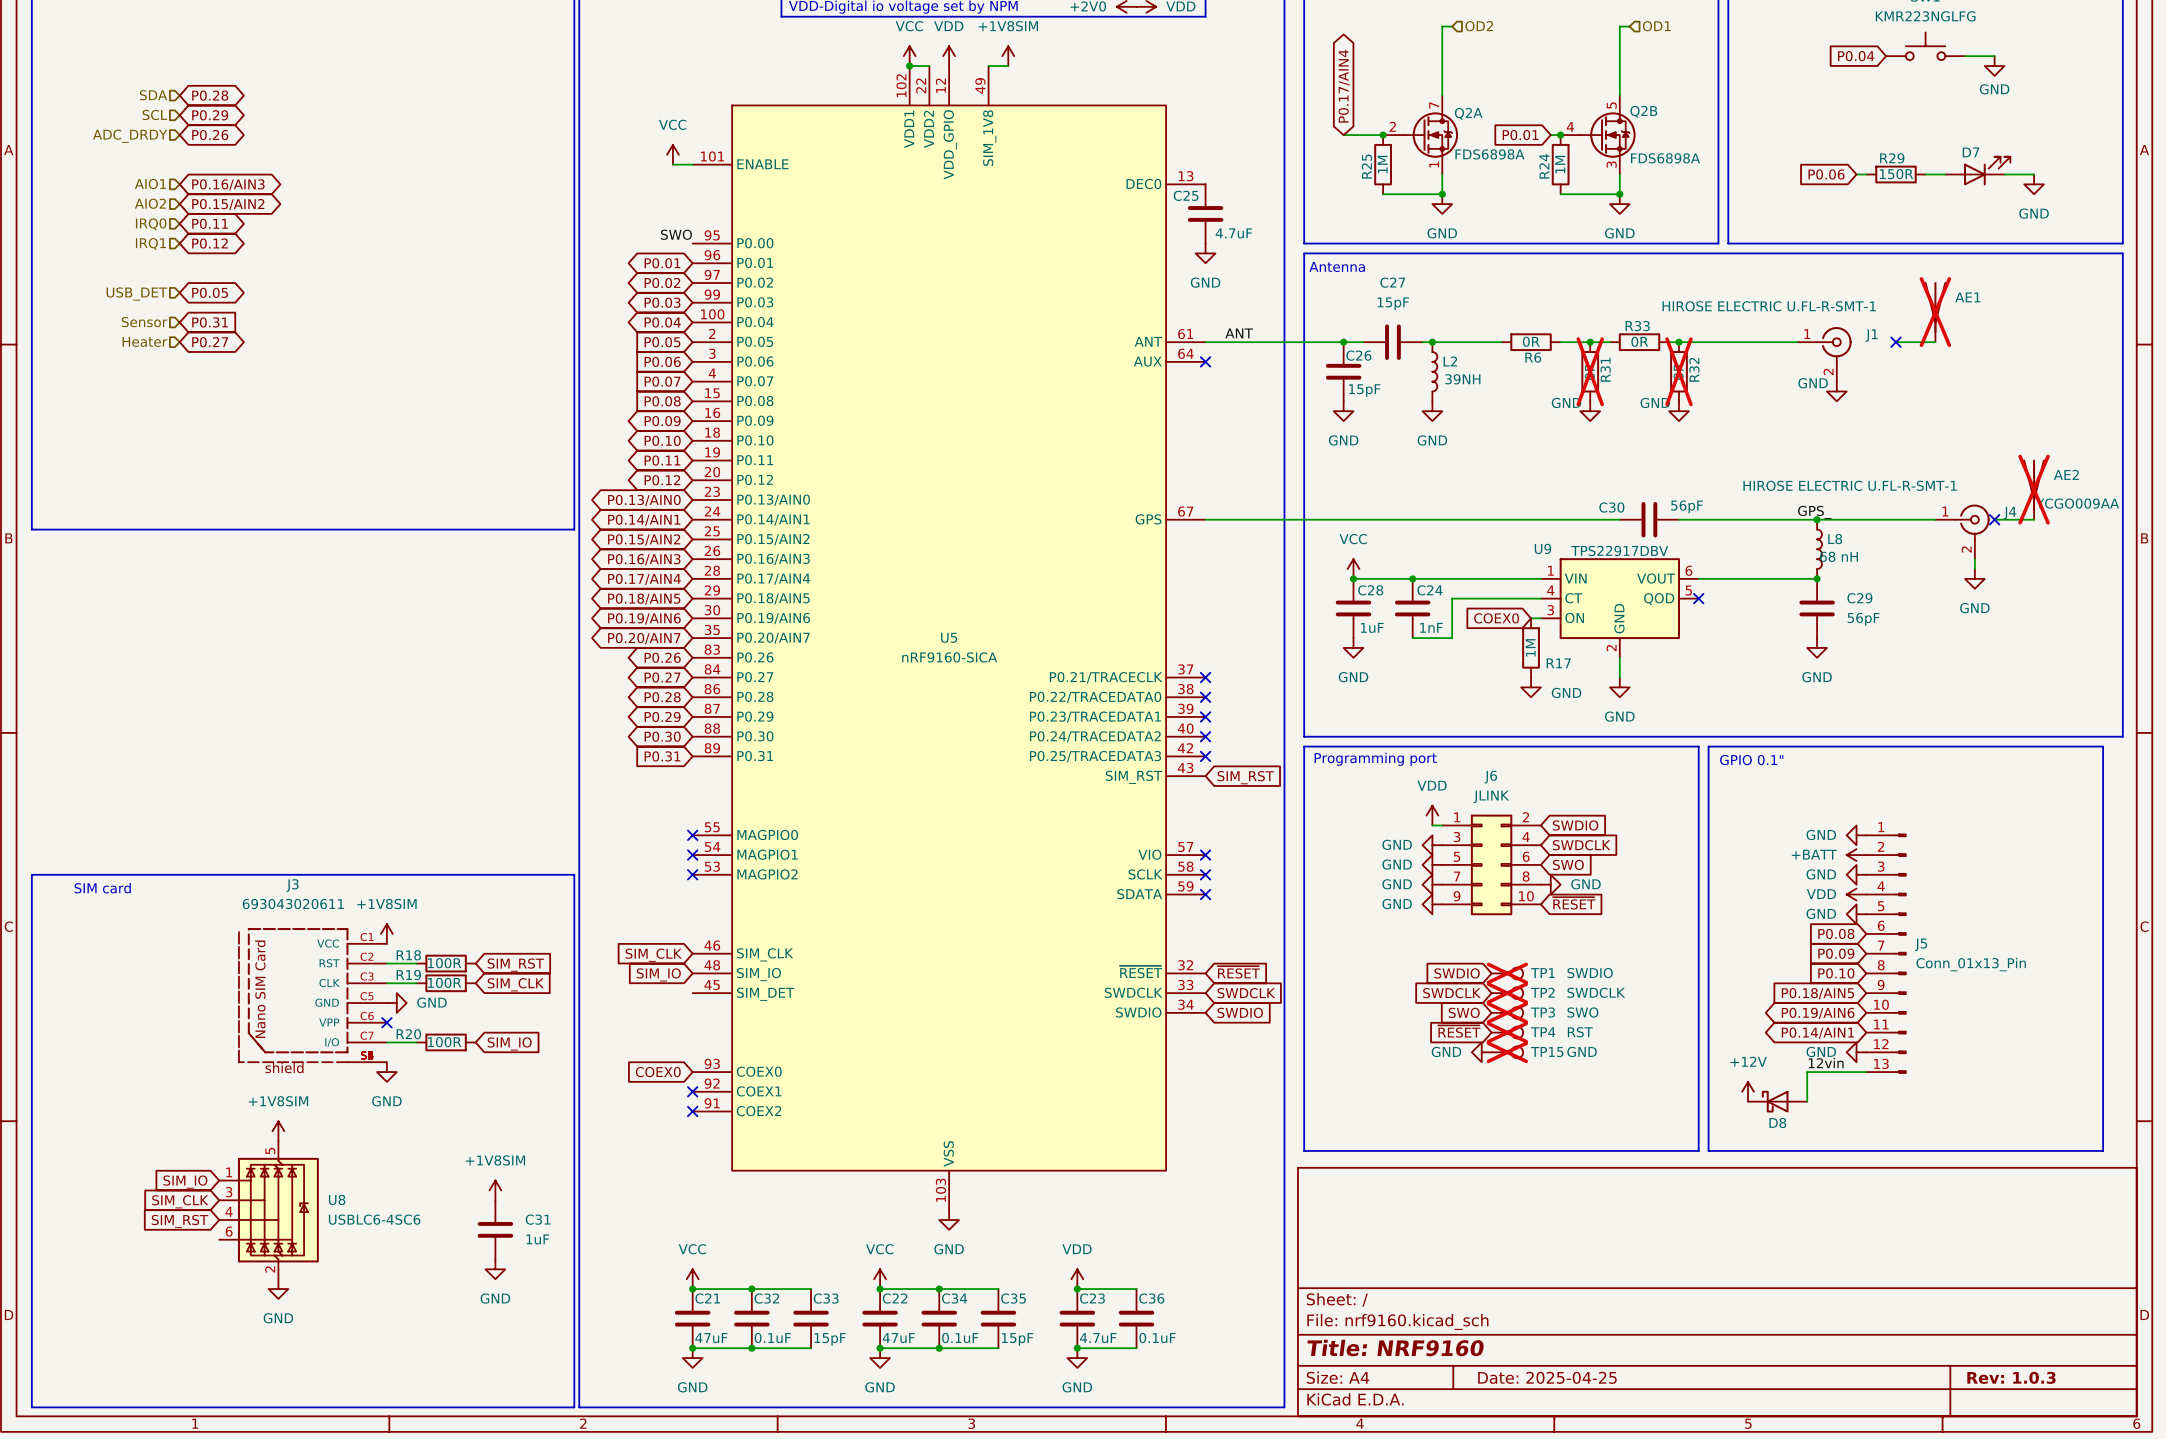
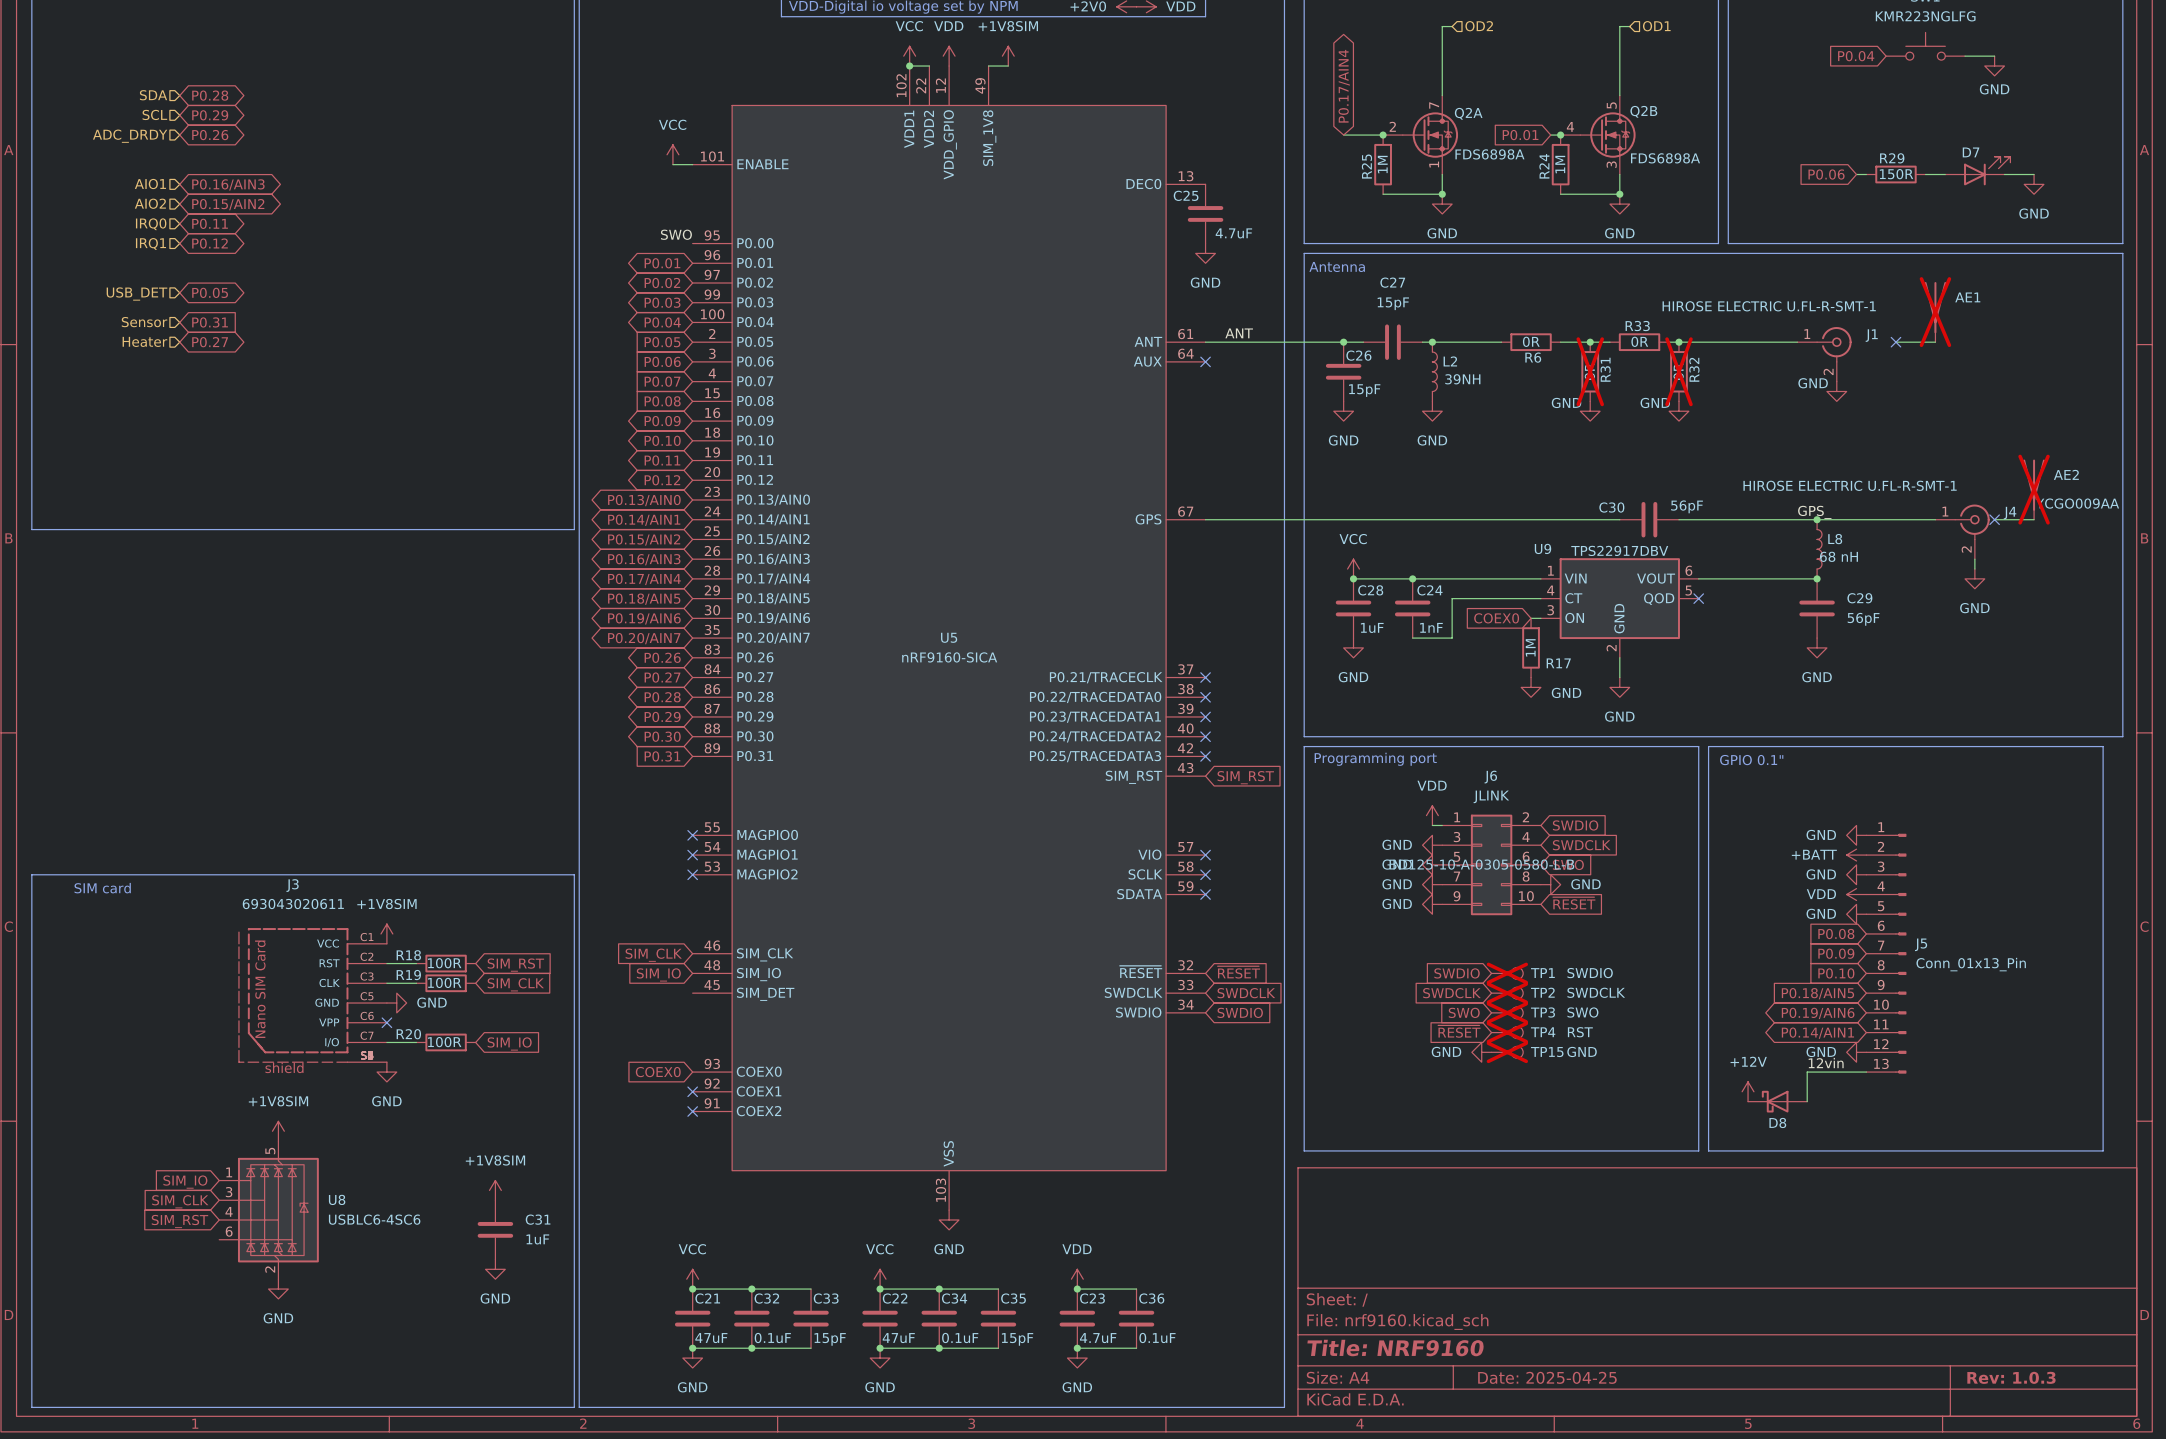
J6 text: none -> BD125-10-A-0305-0580-L-B (1481, 864)

